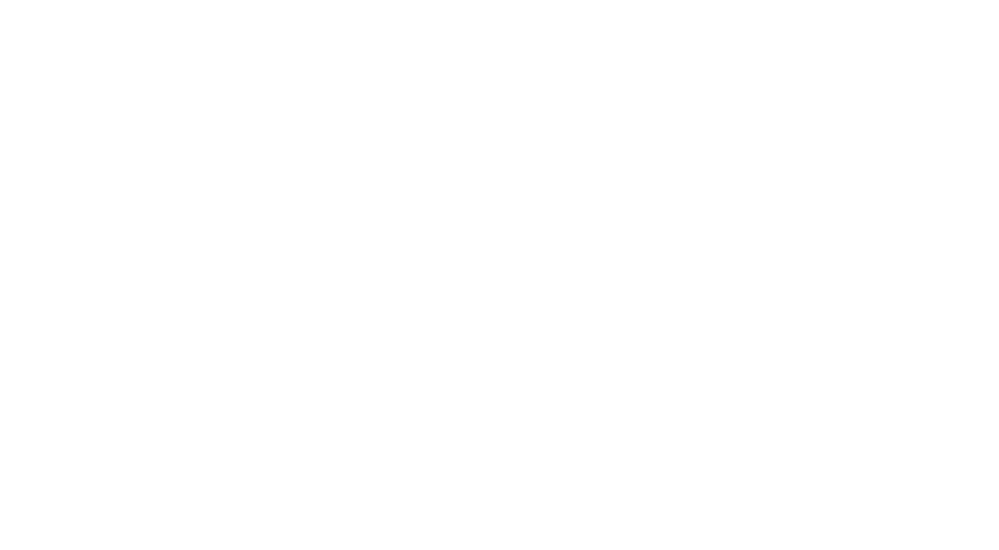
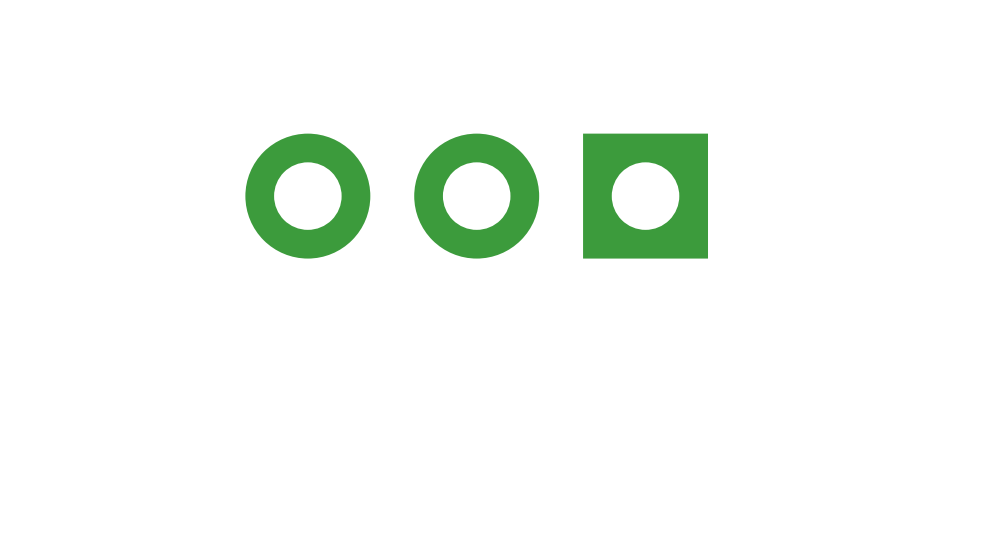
part: none -> (476, 196)

